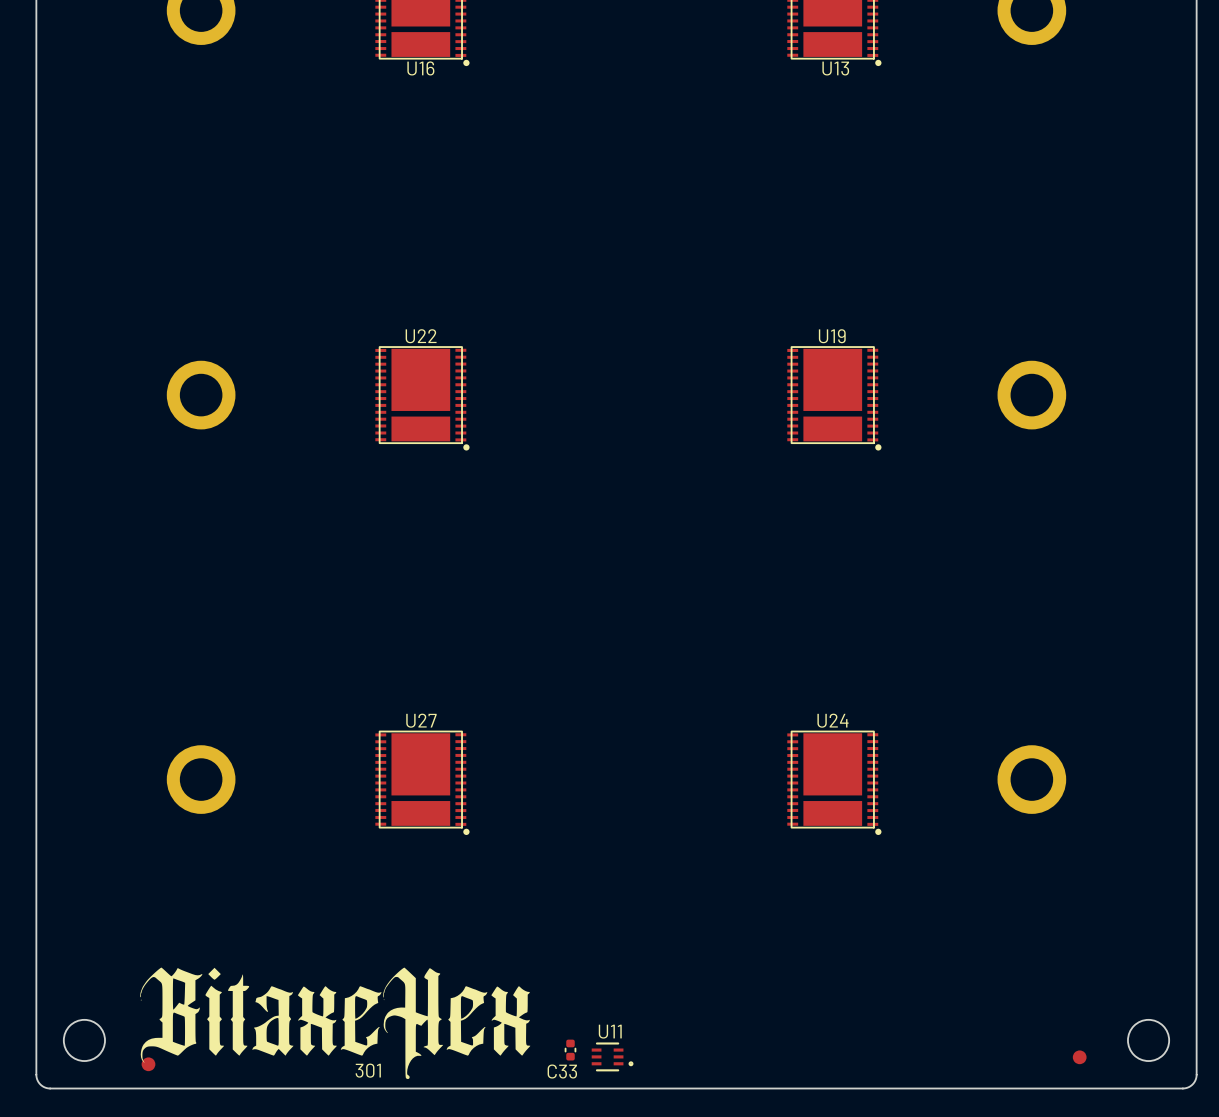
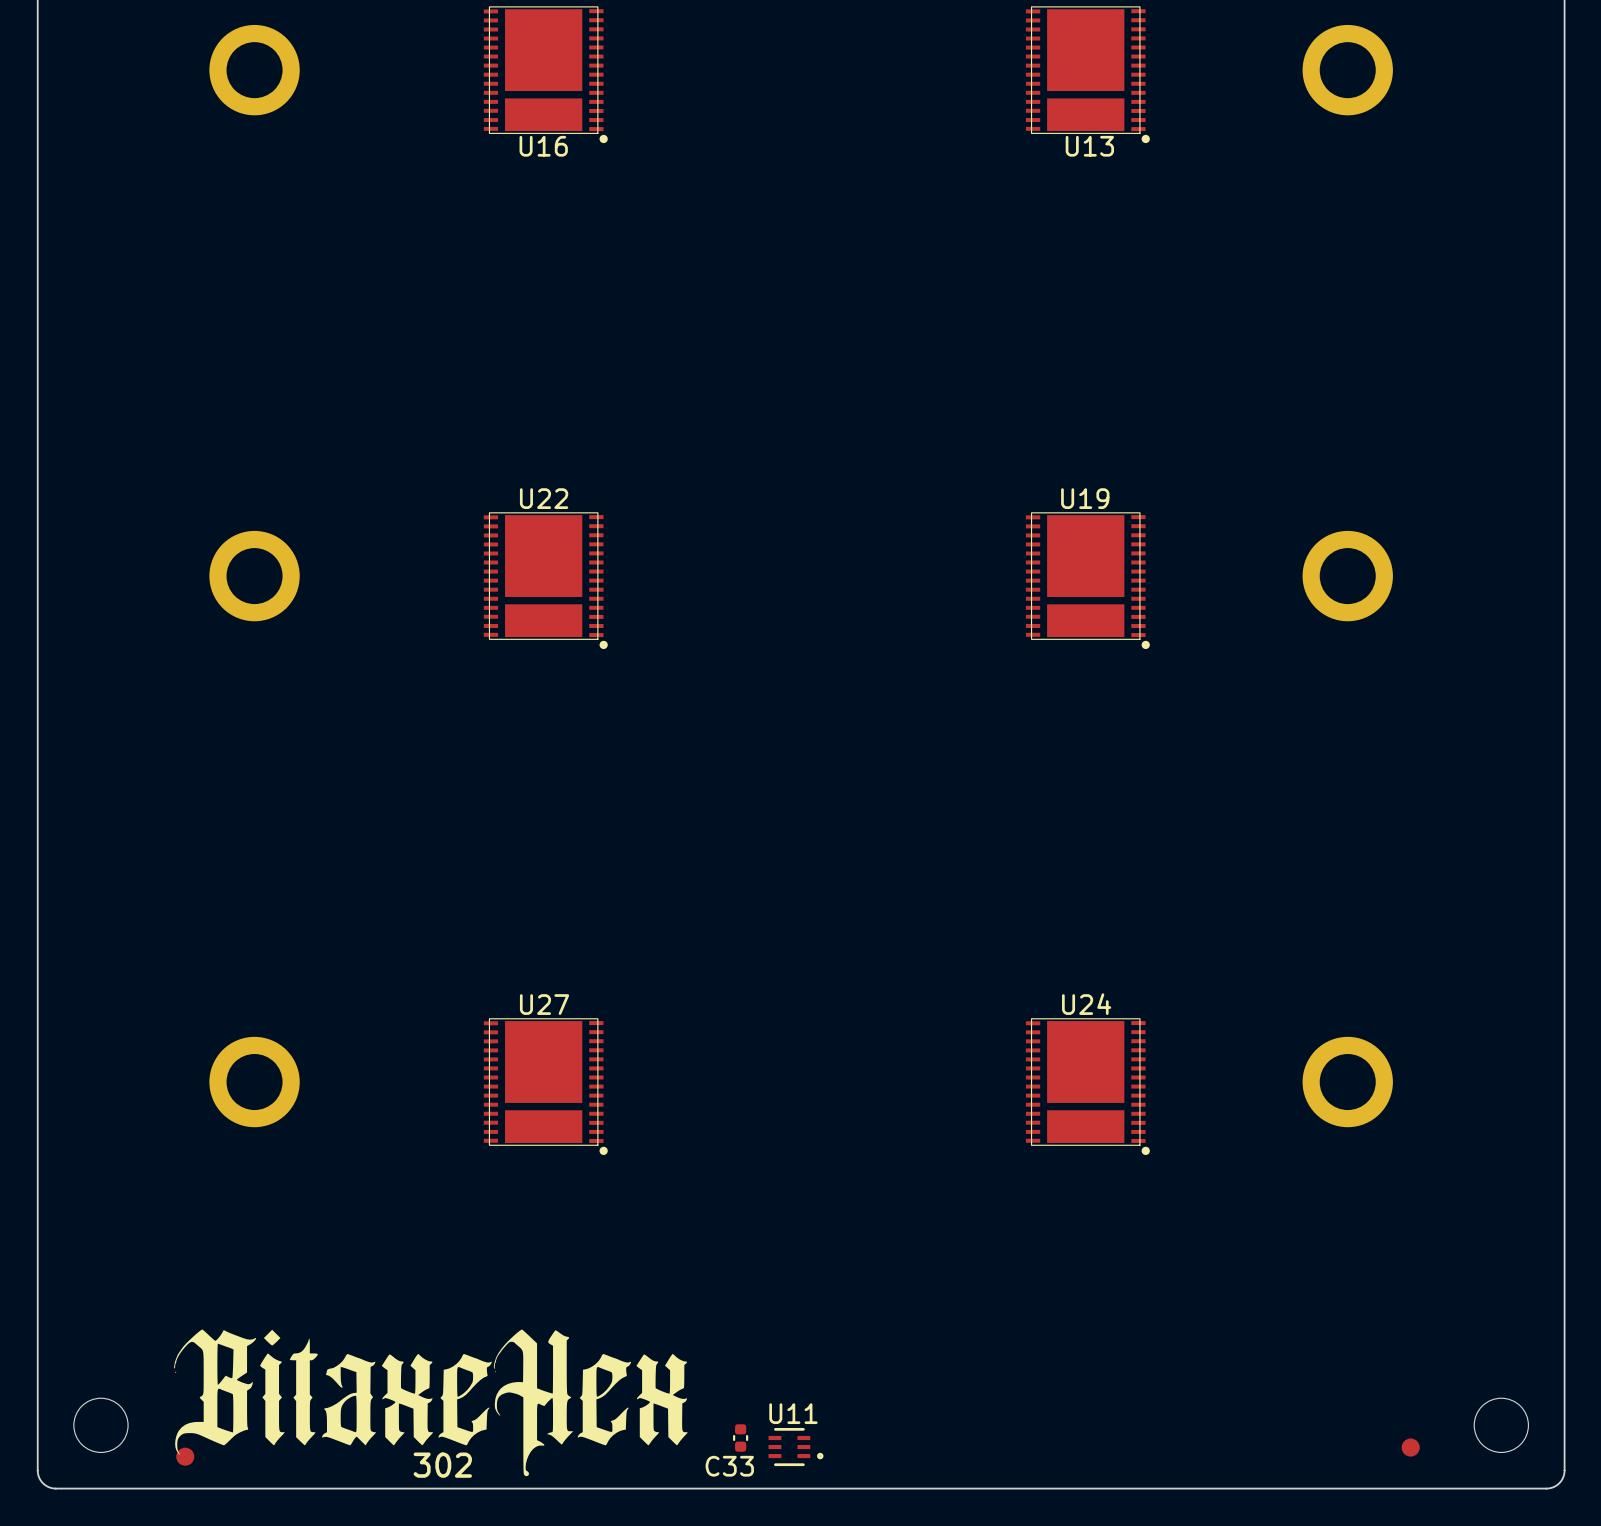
text: 301 (368, 1070) -> 302 (442, 1465)

